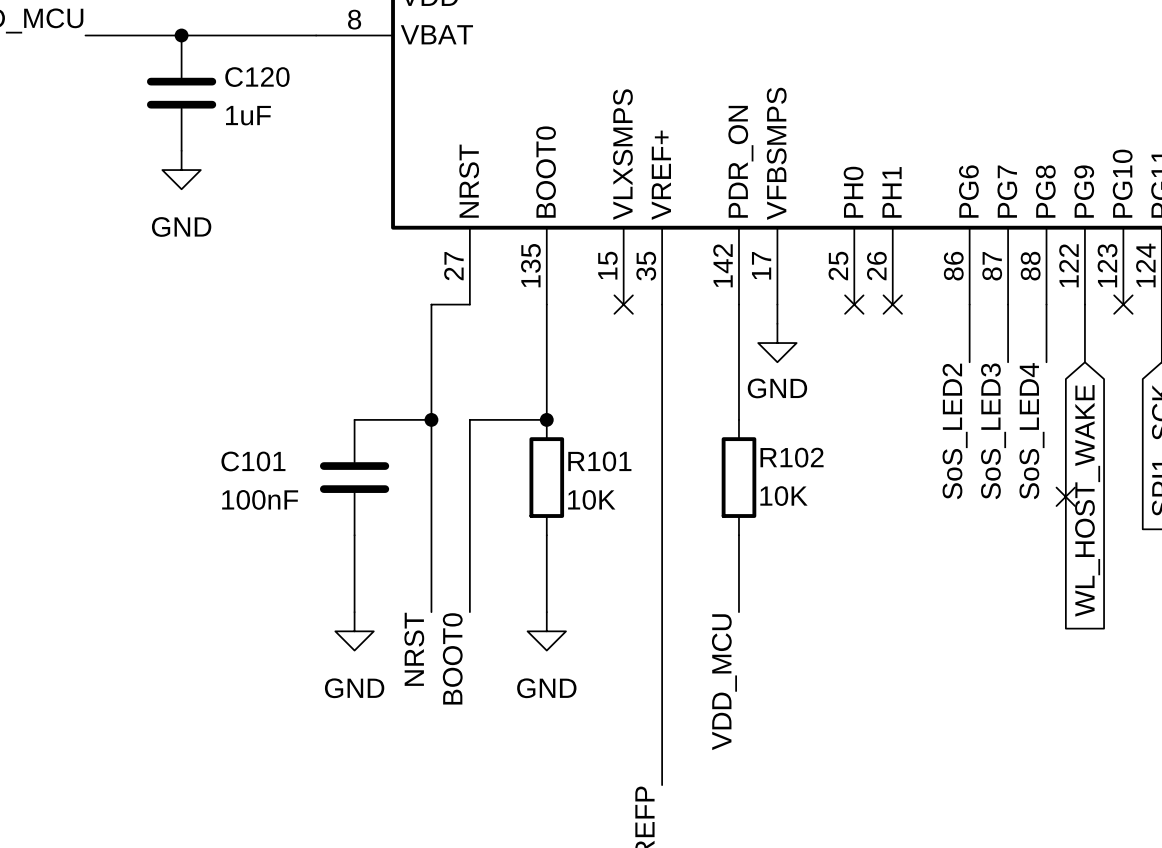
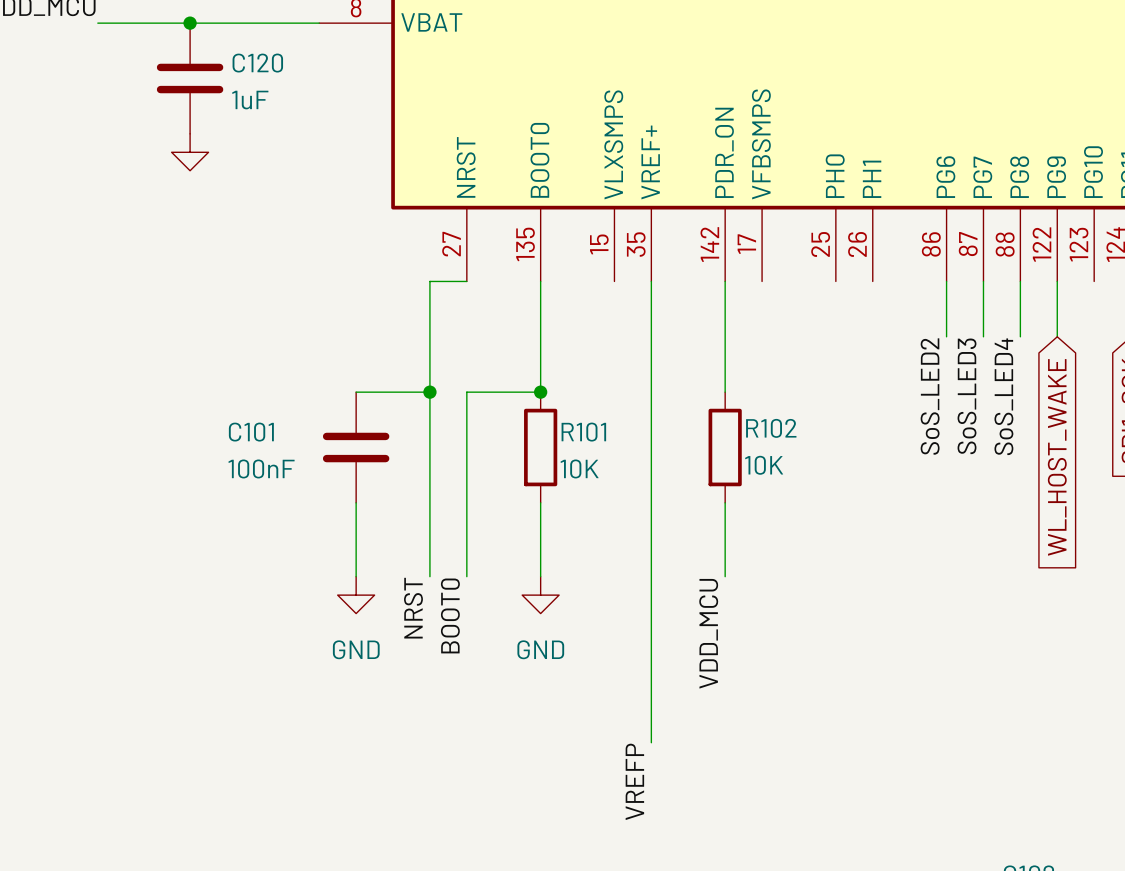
power symbol text: GND (181, 226) -> none
no-connect mark: (623, 304) -> none
wire: (777, 304) (777, 323) -> none
no-connect mark: (854, 304) -> none
no-connect mark: (892, 304) -> none
no-connect mark: (1123, 304) -> none
power symbol: GND (777, 343) -> none
no-connect mark: (1065, 496) -> none

